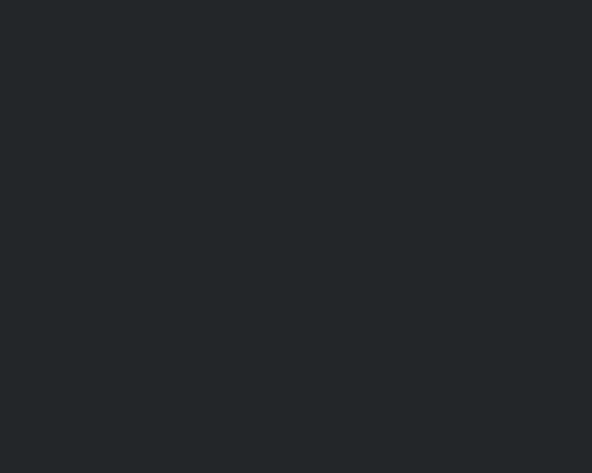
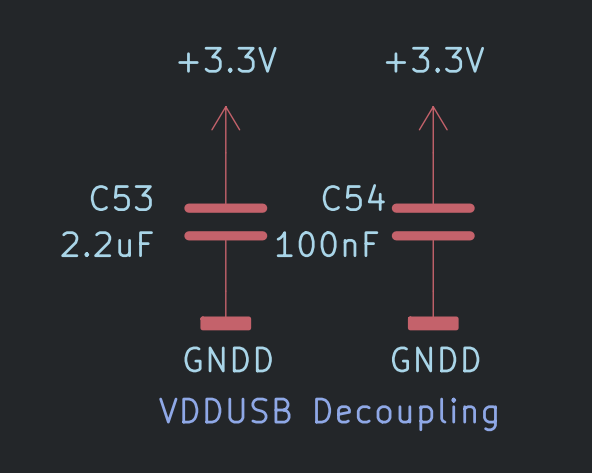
power symbol: none -> +3.3V (225, 129)
power symbol: none -> +3.3V (433, 129)
C53: none -> 2.2uF (225, 221)
C54: none -> 100nF (433, 221)
power symbol: none -> GNDD (225, 310)
power symbol: none -> GNDD (433, 310)
text: none -> VDDUSB Decoupling (328, 414)

